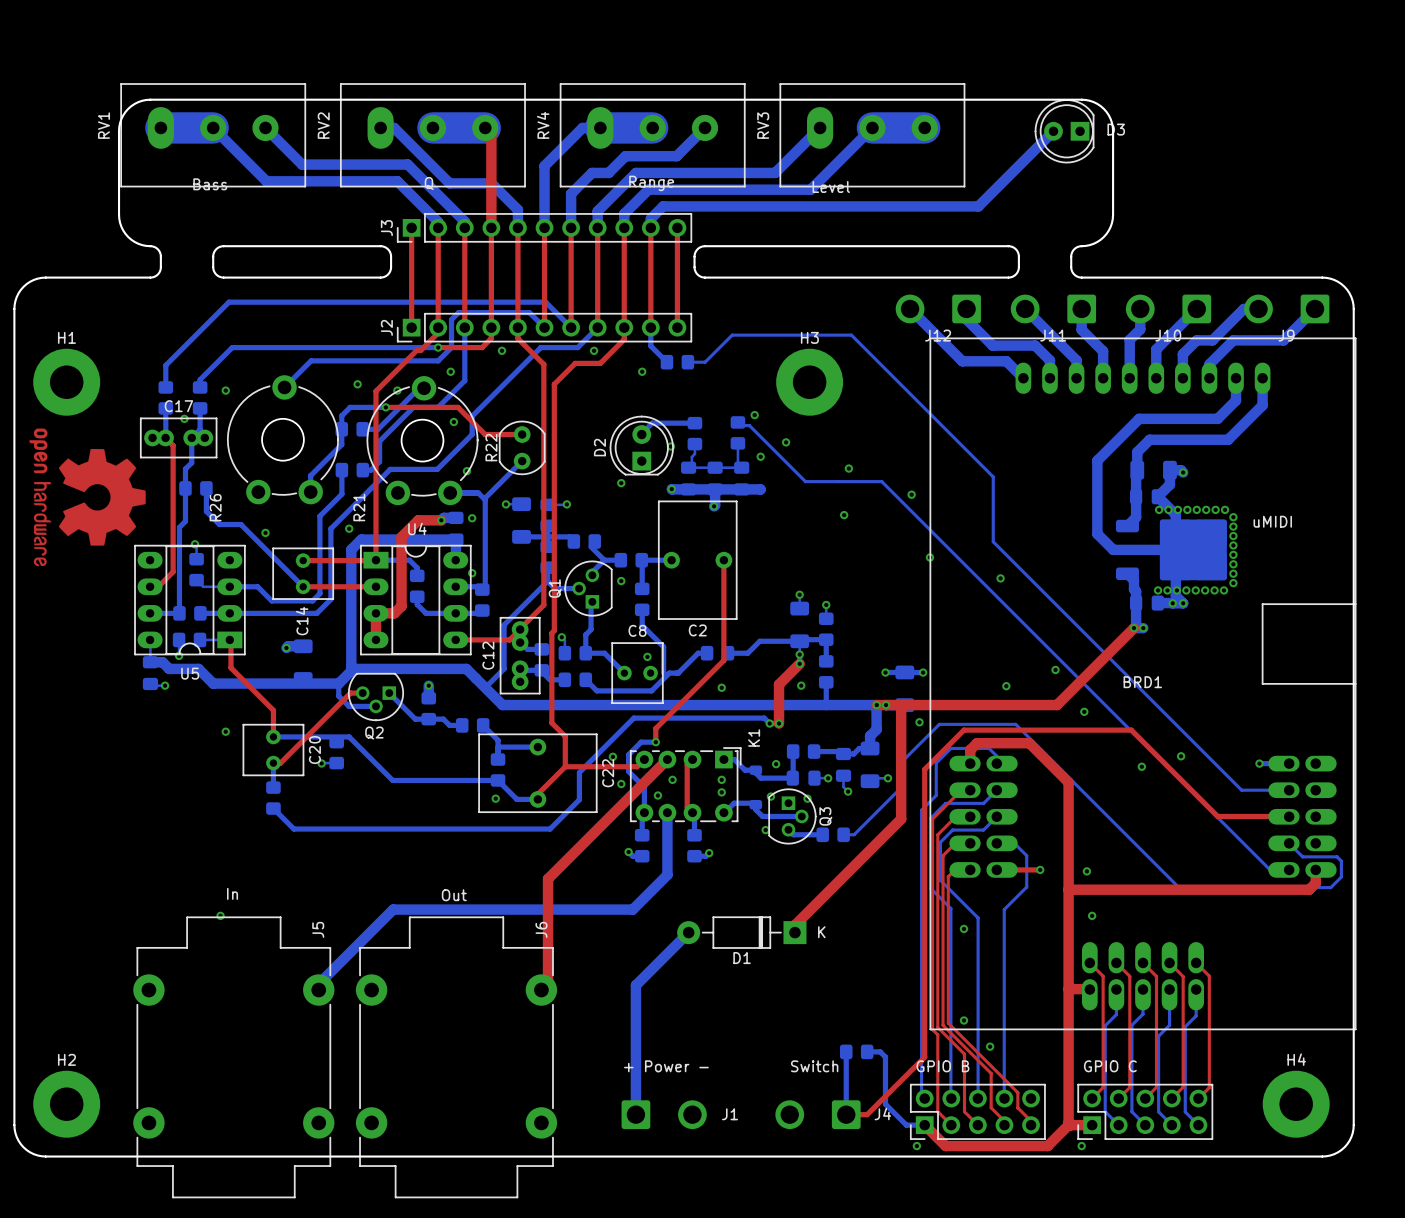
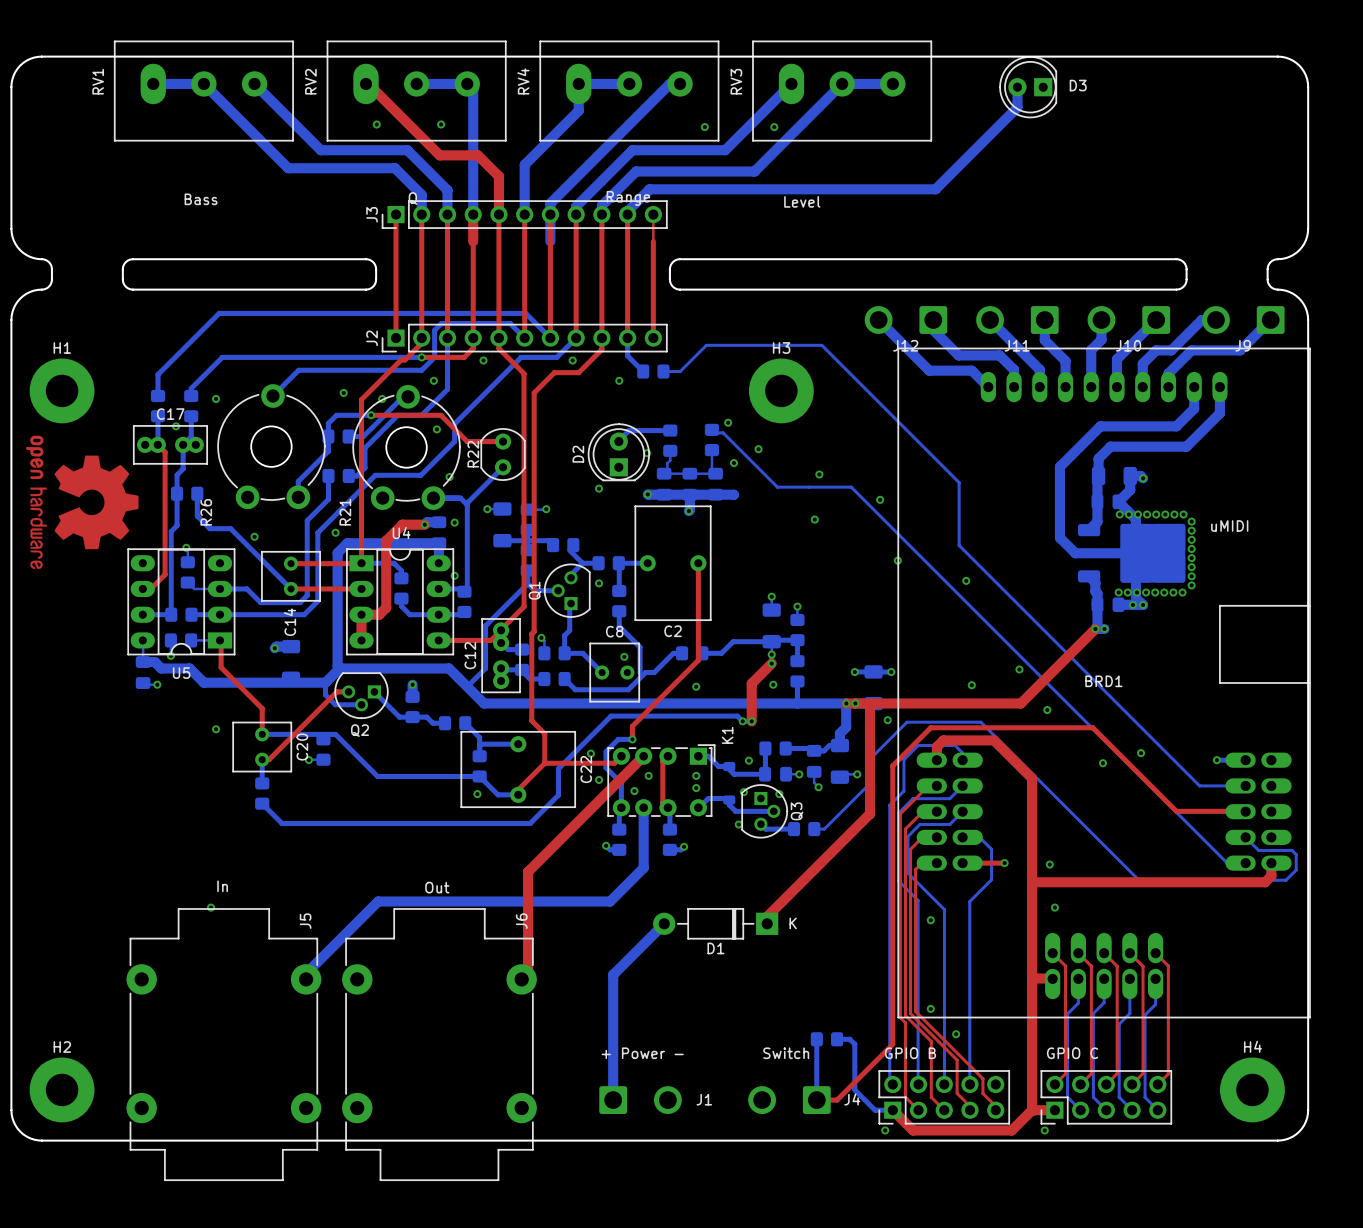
bottom track: none -> (153, 83) (203, 83) (288, 168) (395, 168) (421, 194) (421, 214)
bottom track: none -> (254, 83) (320, 150) (407, 150) (447, 190) (447, 214)
top track: none -> (365, 83) (368, 83) (439, 155) (477, 155) (498, 176) (498, 241)
bottom track: none -> (416, 83) (467, 83) (473, 89) (473, 214)
bottom track: none -> (791, 83) (725, 150) (632, 150) (576, 206) (576, 214)
bottom track: none -> (892, 83) (842, 83) (754, 171) (636, 171) (601, 205) (601, 214)
bottom track: none -> (1017, 87) (1017, 107) (935, 189) (649, 189) (627, 211) (627, 214)
via: none -> (376, 124)
via: none -> (441, 124)
via: none -> (704, 127)
via: none -> (774, 127)
bottom track: (160, 127) (213, 127) (266, 181) (397, 181) (438, 222) (438, 227) -> none
bottom track: (265, 127) (302, 164) (407, 164) (464, 221) (464, 227) -> none
bottom track: (380, 127) (394, 127) (449, 183) (491, 183) (517, 209) (517, 227) -> none
bottom track: (432, 127) (485, 127) (491, 134) -> none
top track: (485, 127) (491, 134) (491, 200) -> none
bottom track: (652, 127) (582, 127) (544, 165) -> (629, 83) (578, 83) (578, 110) (524, 164) (524, 181)
bottom track: (704, 127) (676, 156) (625, 156) (608, 172) (591, 172) (571, 193) -> (680, 83) (669, 83) (550, 203) (550, 208)
bottom track: (820, 127) (775, 172) (635, 172) (597, 211) (597, 227) -> none
bottom track: (924, 127) (872, 127) (810, 189) (648, 189) (624, 213) (624, 227) -> none
bottom track: (1053, 131) (978, 206) (663, 206) (650, 218) (650, 227) -> none
D3 position: (1064, 131) -> (1028, 87)
RV1 position: (213, 135) -> (203, 91)
RV2 position: (432, 135) -> (416, 91)
RV4 position: (652, 135) -> (629, 91)
RV3 position: (872, 135) -> (842, 91)
top track: none -> (396, 214) (396, 241)
top track: none -> (421, 214) (421, 241)
top track: none -> (447, 214) (447, 241)
top track: none -> (524, 214) (524, 241)
bottom track: (544, 200) (544, 227) -> none
top track: none -> (550, 214) (550, 241)
top track: none -> (576, 214) (576, 241)
top track: none -> (601, 214) (601, 241)
top track: none -> (627, 214) (627, 241)
top track: none -> (653, 214) (653, 241)
J3 position: (544, 227) -> (524, 214)
board edge: (223, 246) (216, 249) (213, 256) (214, 271) (218, 275) (223, 277) -> (143, 289) (214, 289)
board edge: (1008, 246) (1015, 249) (1018, 256) (1017, 271) (1014, 275) (1008, 277) -> (1044, 289) (973, 289)
board edge: (45, 277) (139, 277) -> (214, 259) (129, 259) (123, 266) (122, 280) (125, 286) (132, 289)
board edge: none -> (41, 289) (47, 288) (51, 282) (50, 264) (46, 260) (30, 256) (20, 250) (13, 240) (11, 228) (11, 83) (15, 71) (20, 65) (30, 58) (41, 56) (1281, 56) (1289, 58) (1299, 65) (1305, 75) (1307, 83) (1308, 228) (1305, 240) (1299, 250) (1289, 256) (1273, 260) (1268, 264) (1268, 282) (1272, 288) (1277, 289)
board edge: (150, 277) (156, 275) (160, 270) (159, 252) (154, 247) (138, 243) (128, 237) (121, 226) (119, 214) (120, 122) (123, 115) (131, 106) (138, 102) (150, 99) (1085, 99) (1100, 106) (1108, 115) (1112, 122) (1113, 214) (1110, 226) (1103, 237) (1093, 243) (1077, 247) (1072, 252) (1071, 270) (1075, 275) (1081, 277) -> none
board edge: (1217, 277) (1322, 277) -> (1176, 289) (1183, 286) (1186, 279) (1185, 264) (1177, 259) (973, 259)

